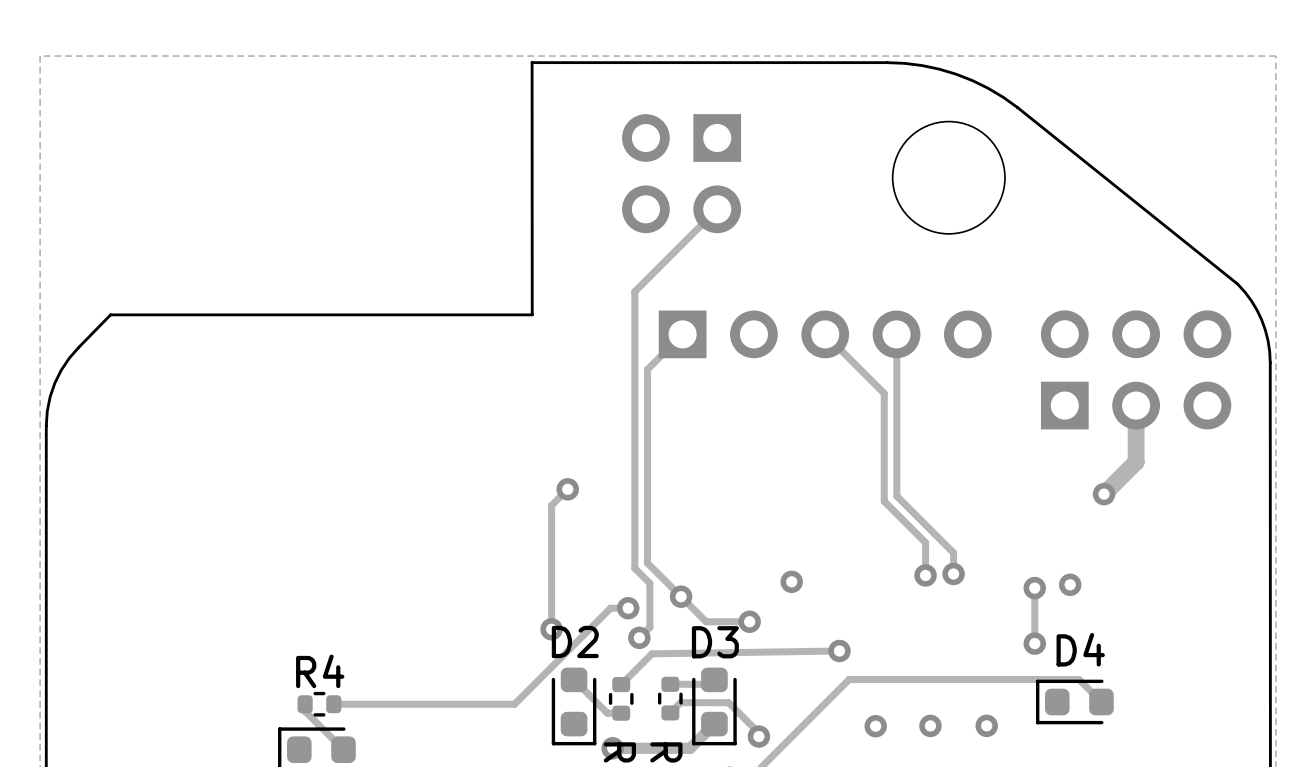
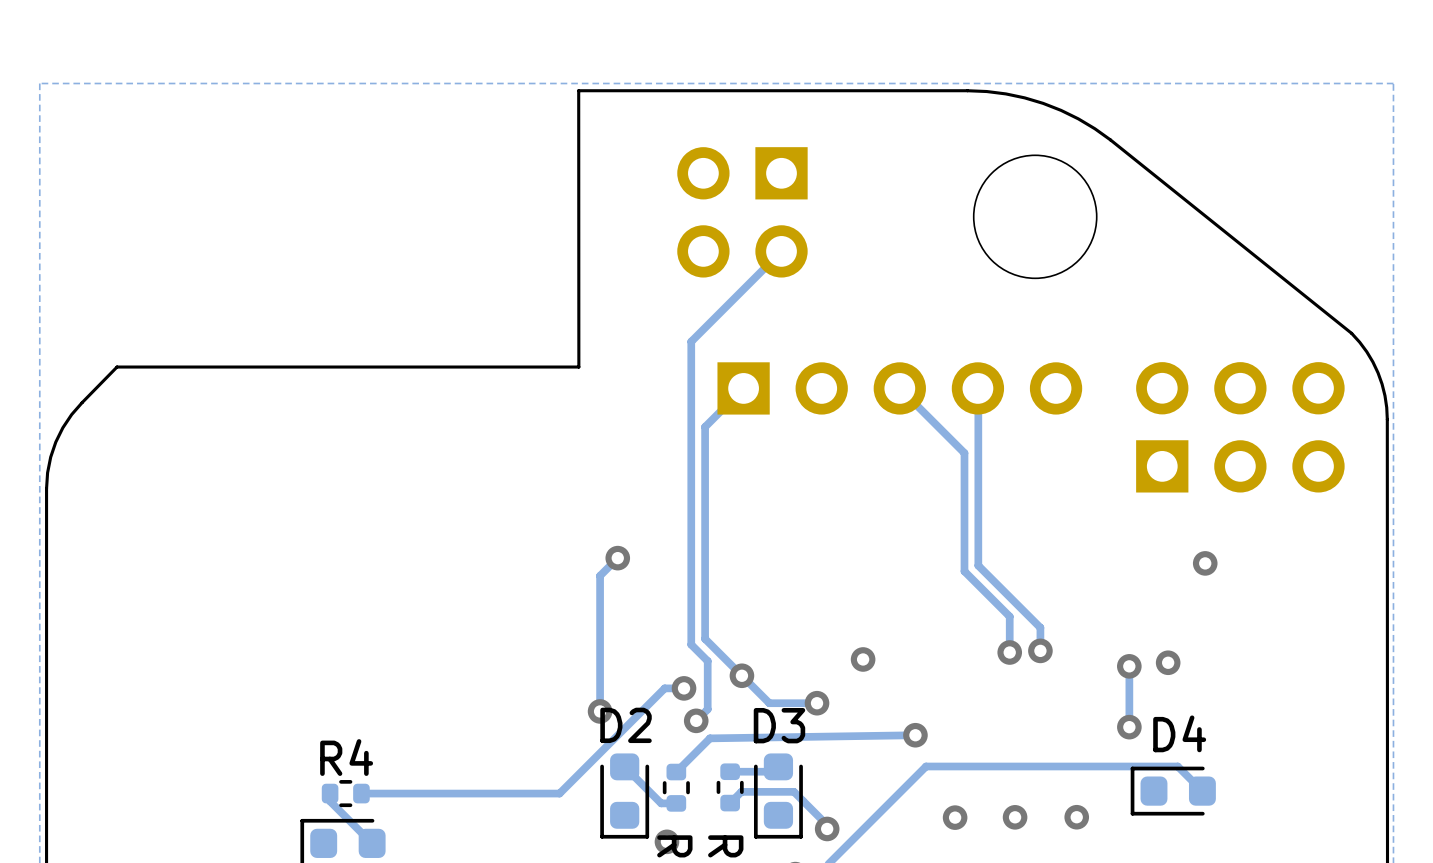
track: (1136, 405) (1136, 462) (1104, 494) -> none
track: (714, 724) (690, 748) (612, 748) -> none

